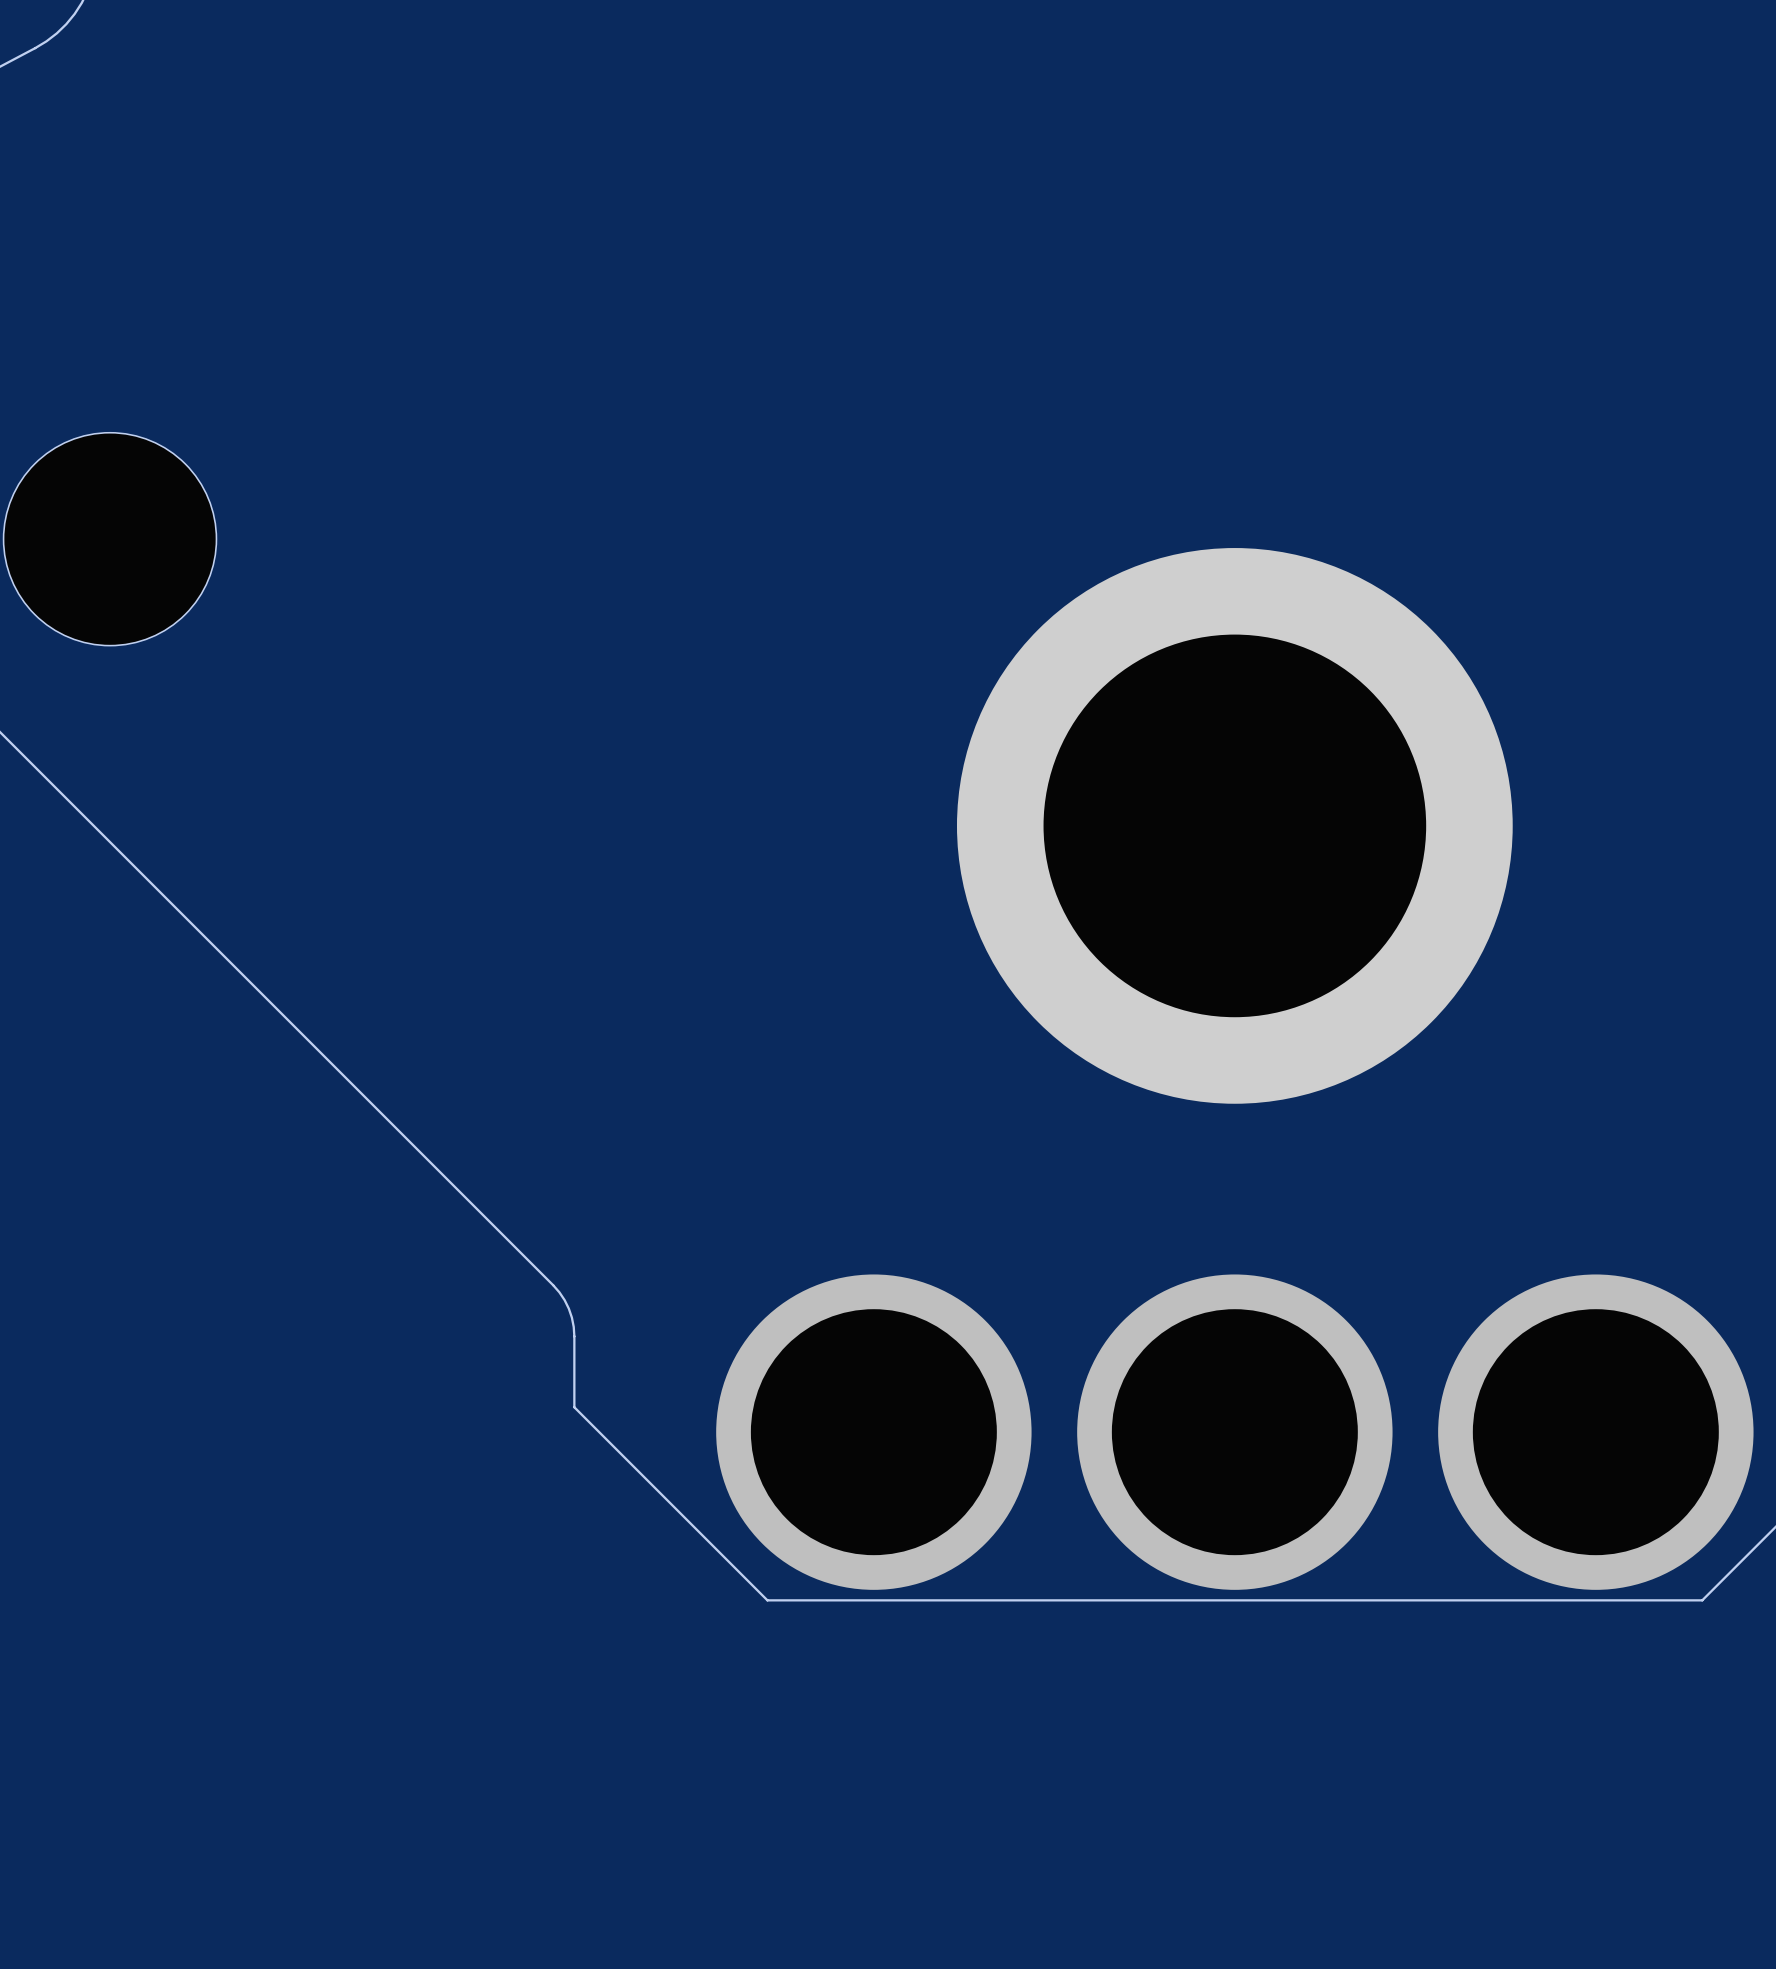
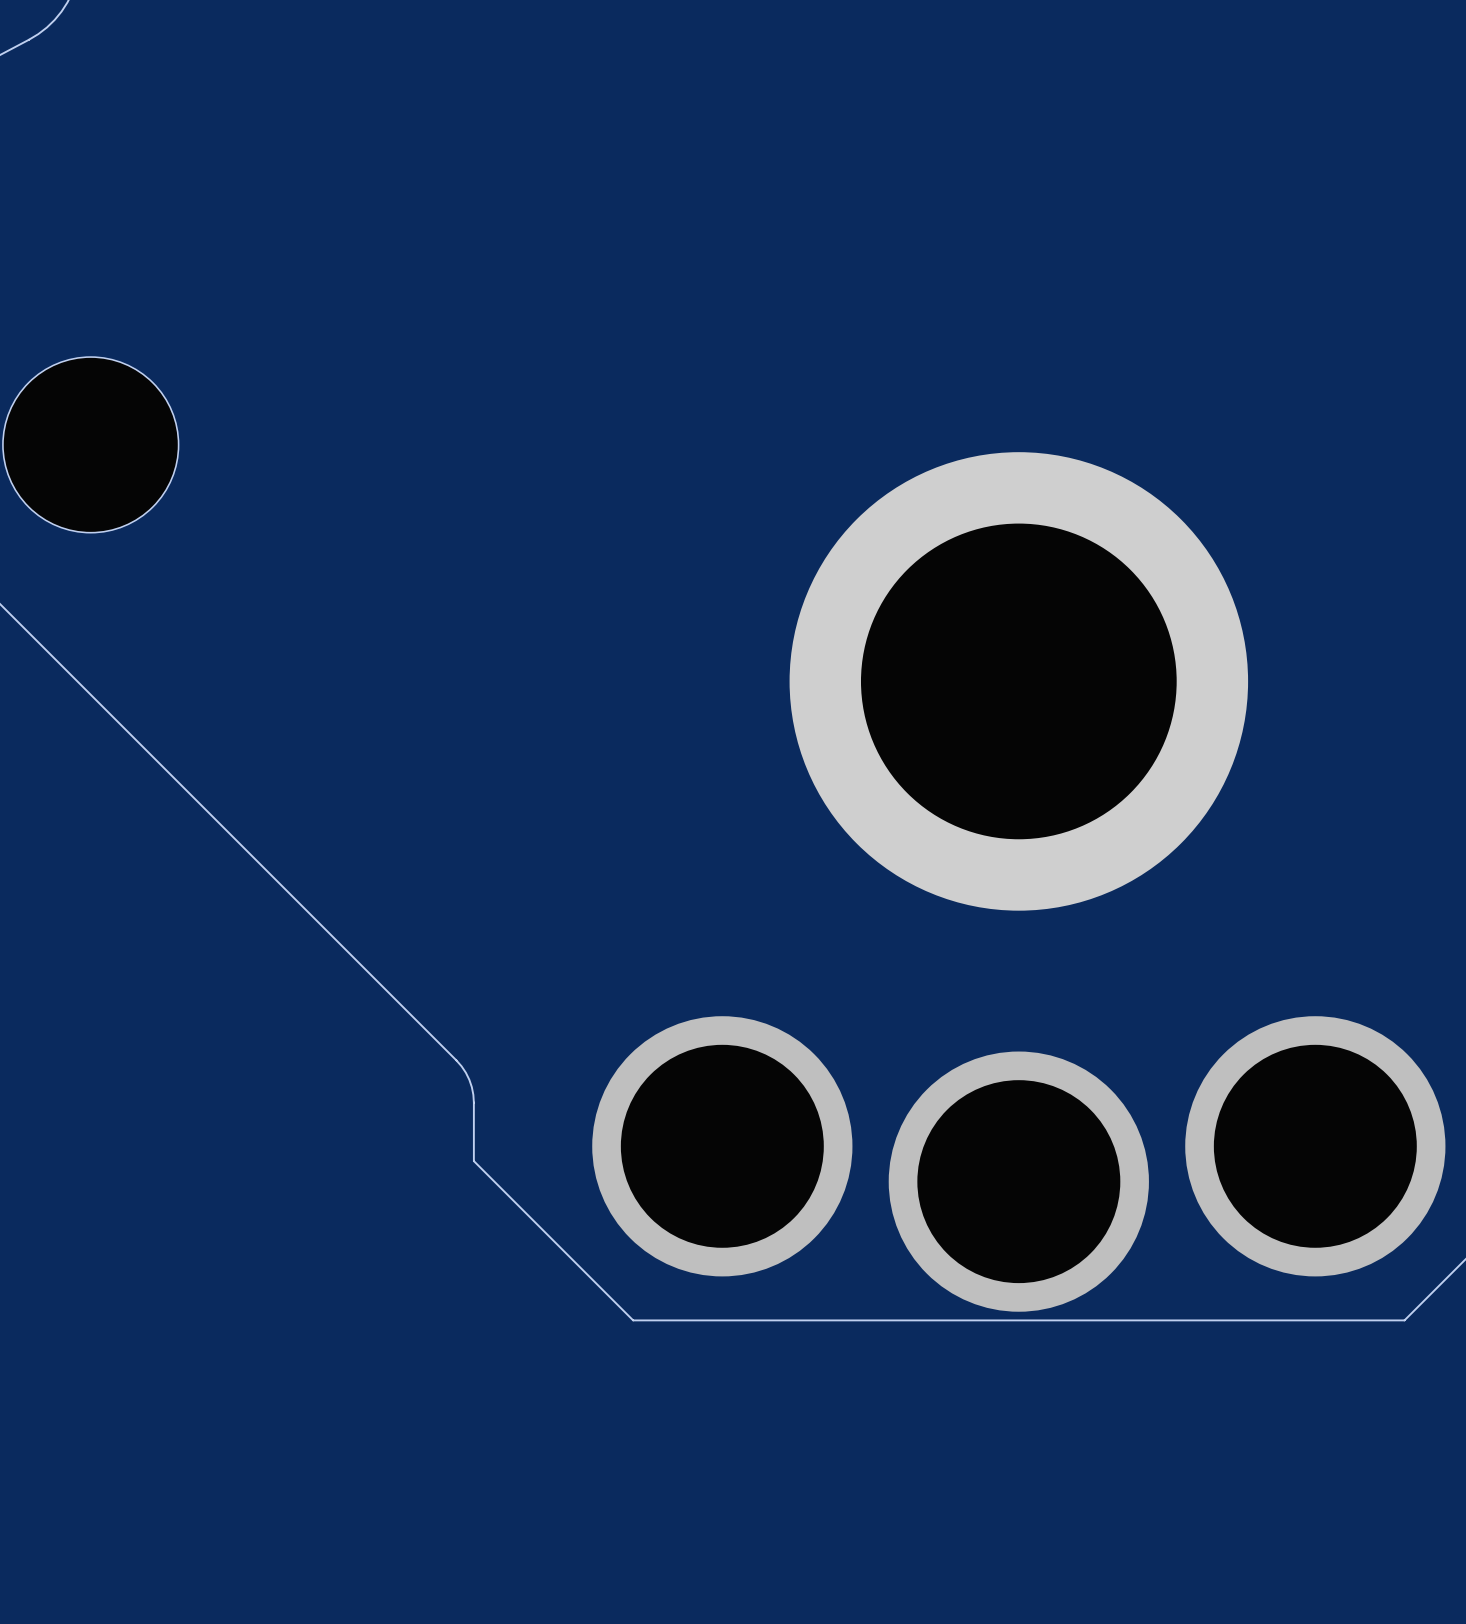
via position: (873, 1432) -> (722, 1146)
via position: (1595, 1432) -> (1315, 1146)

